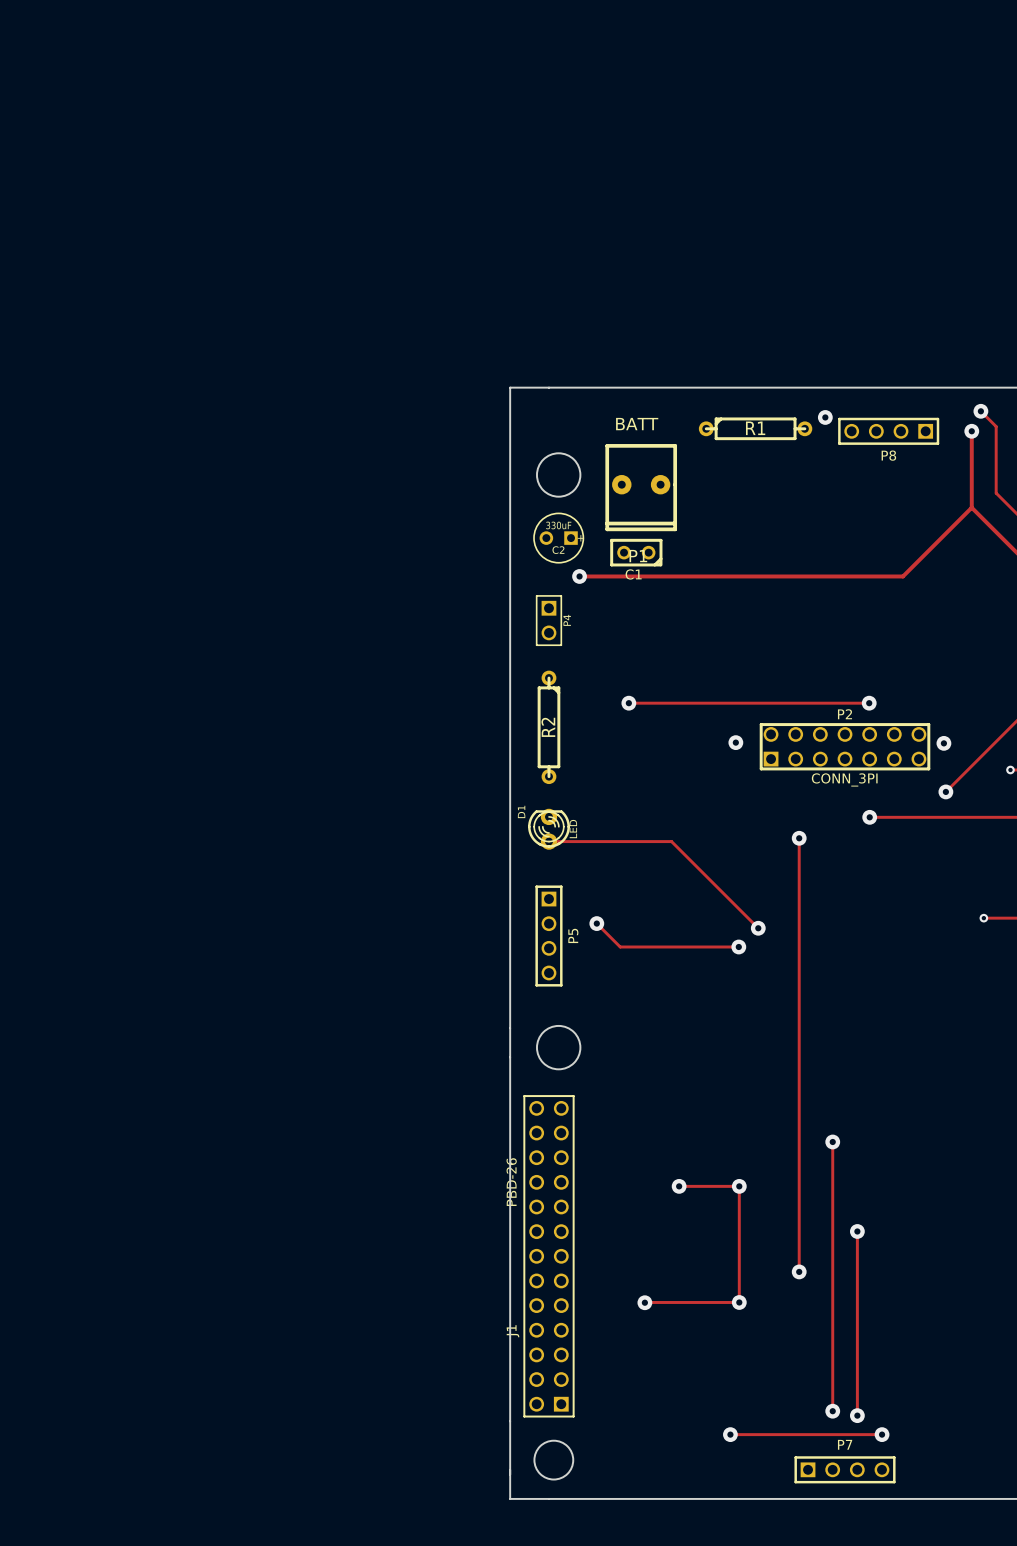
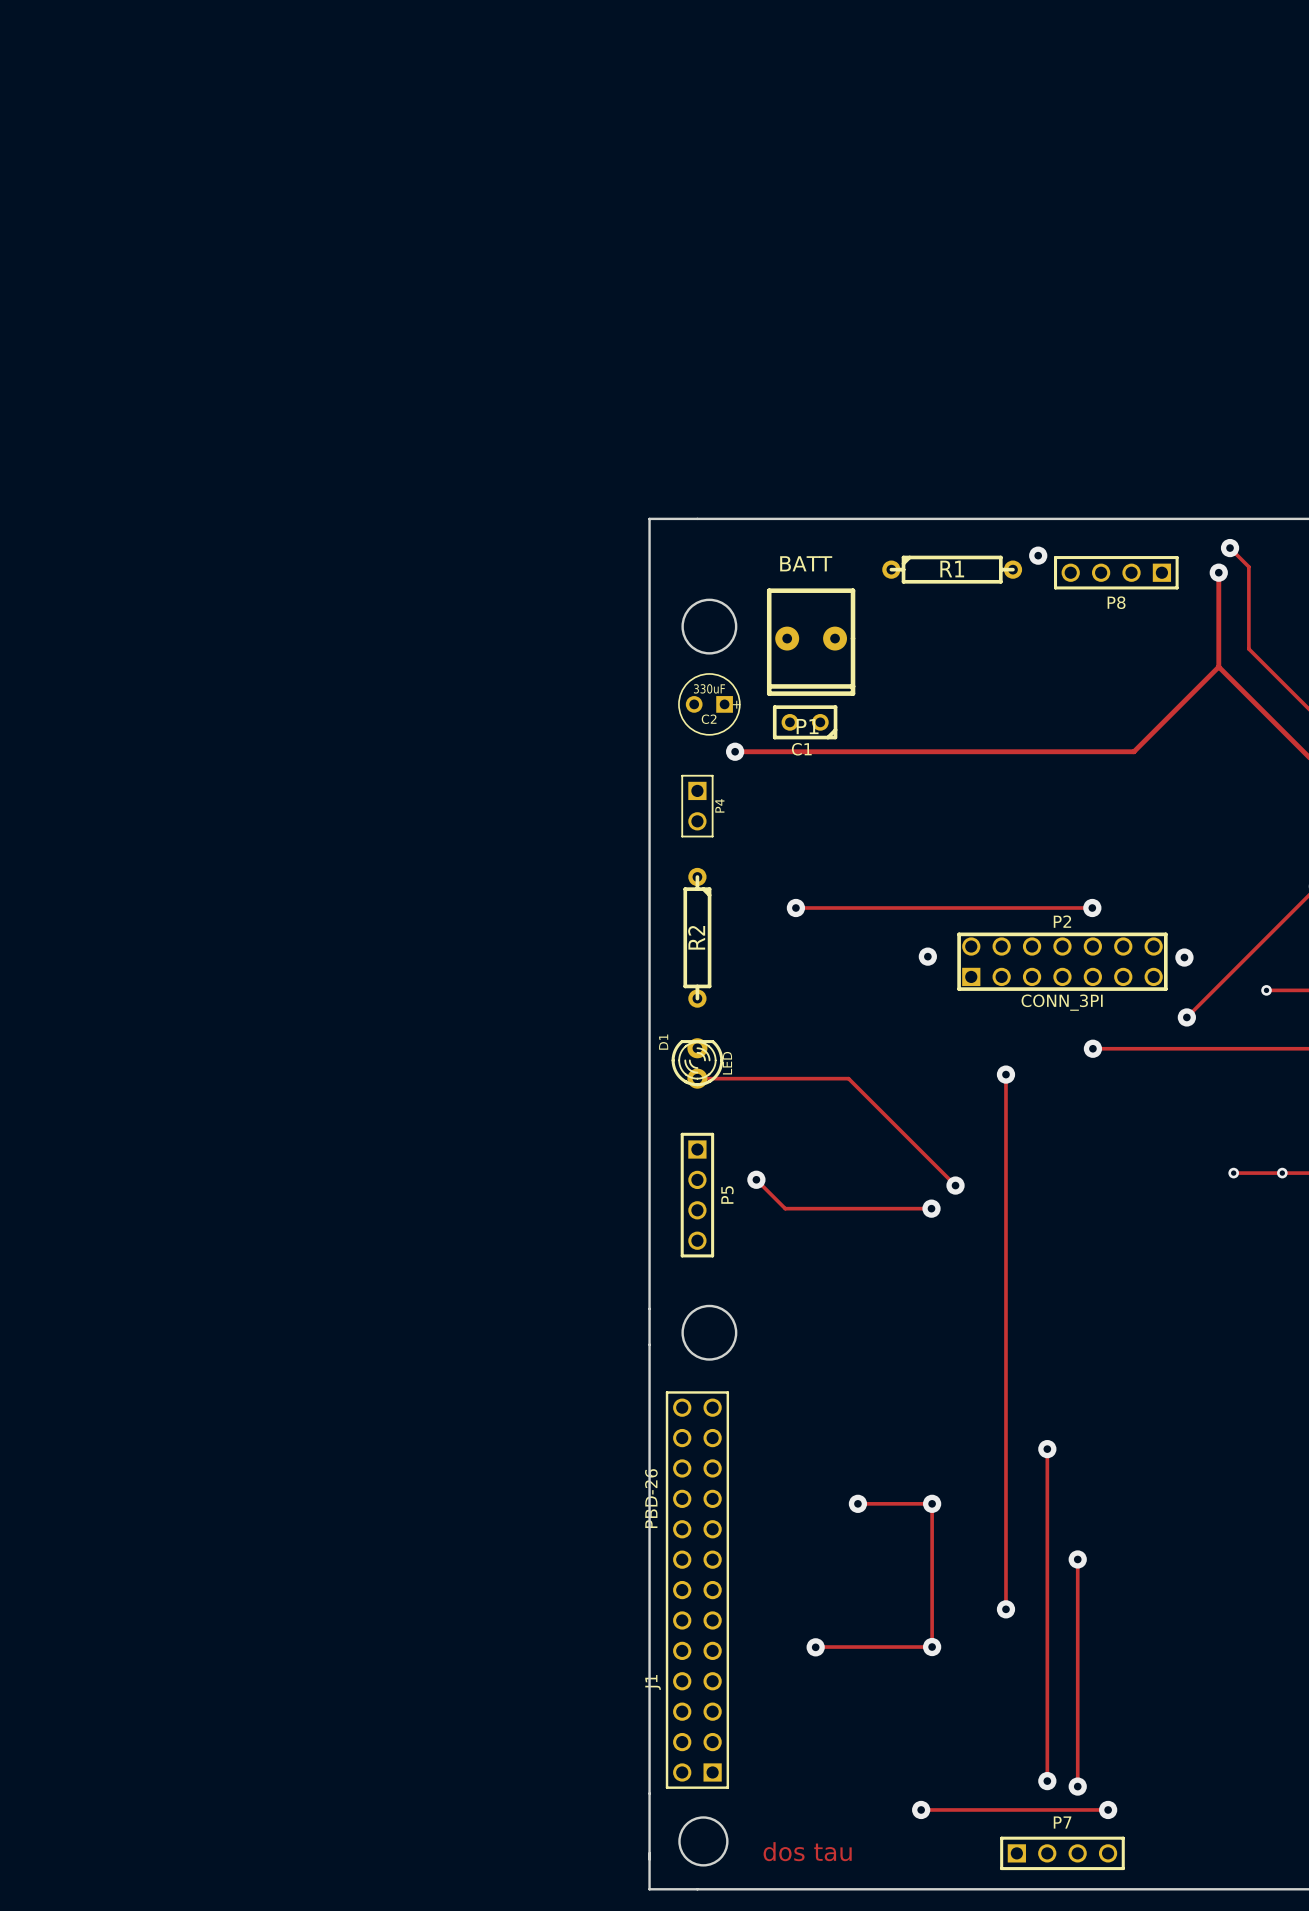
text: none -> dos tau (807, 1851)

